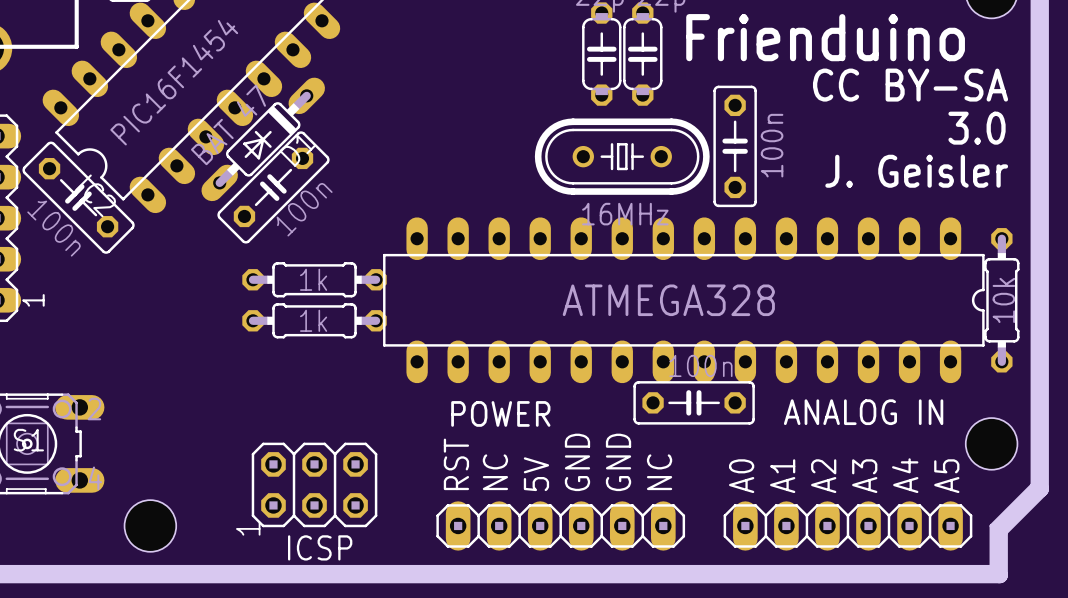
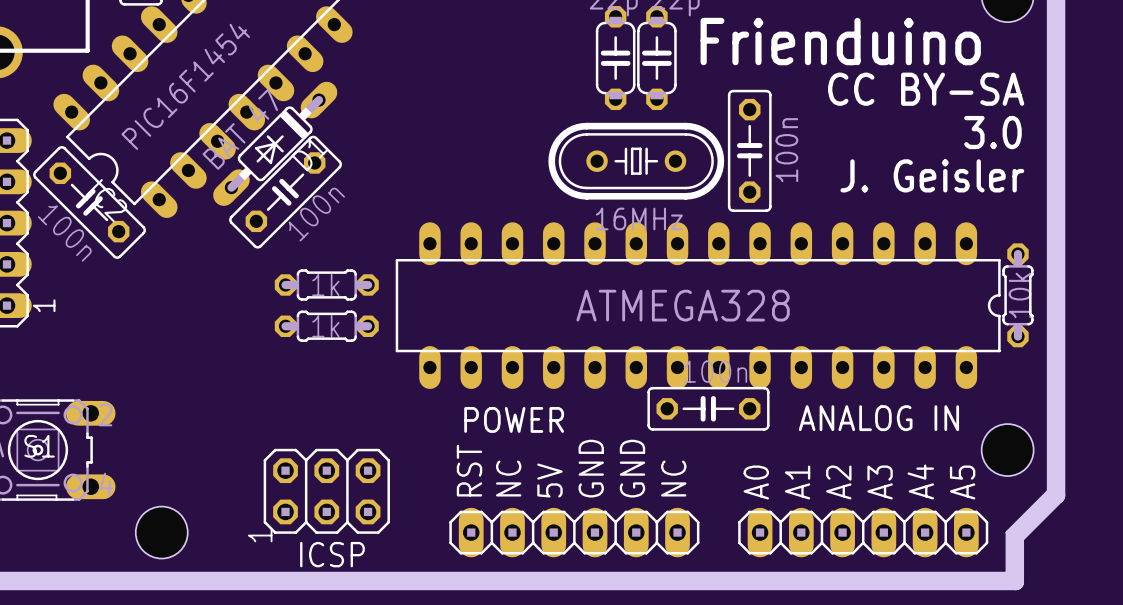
part footprint: [984, 228, 1020, 373] -> [1002, 243, 1034, 348]
part footprint: [242, 262, 387, 298] -> [274, 269, 379, 301]
part footprint: [242, 303, 387, 339] -> [274, 310, 379, 342]

